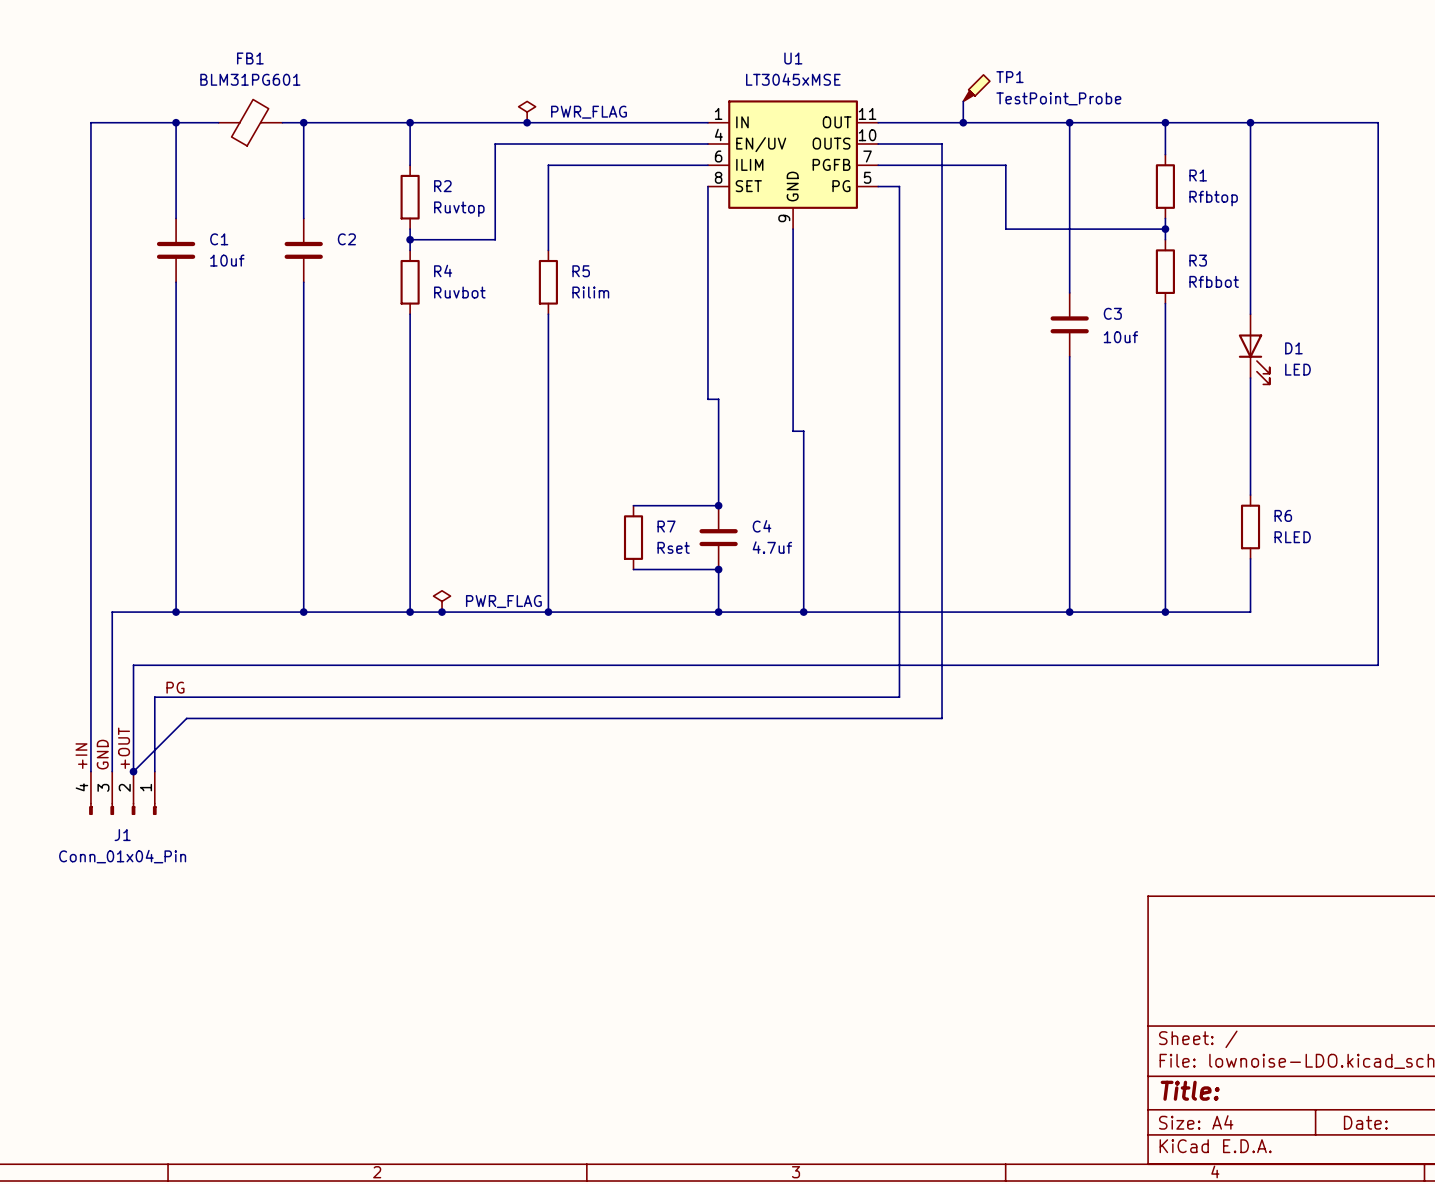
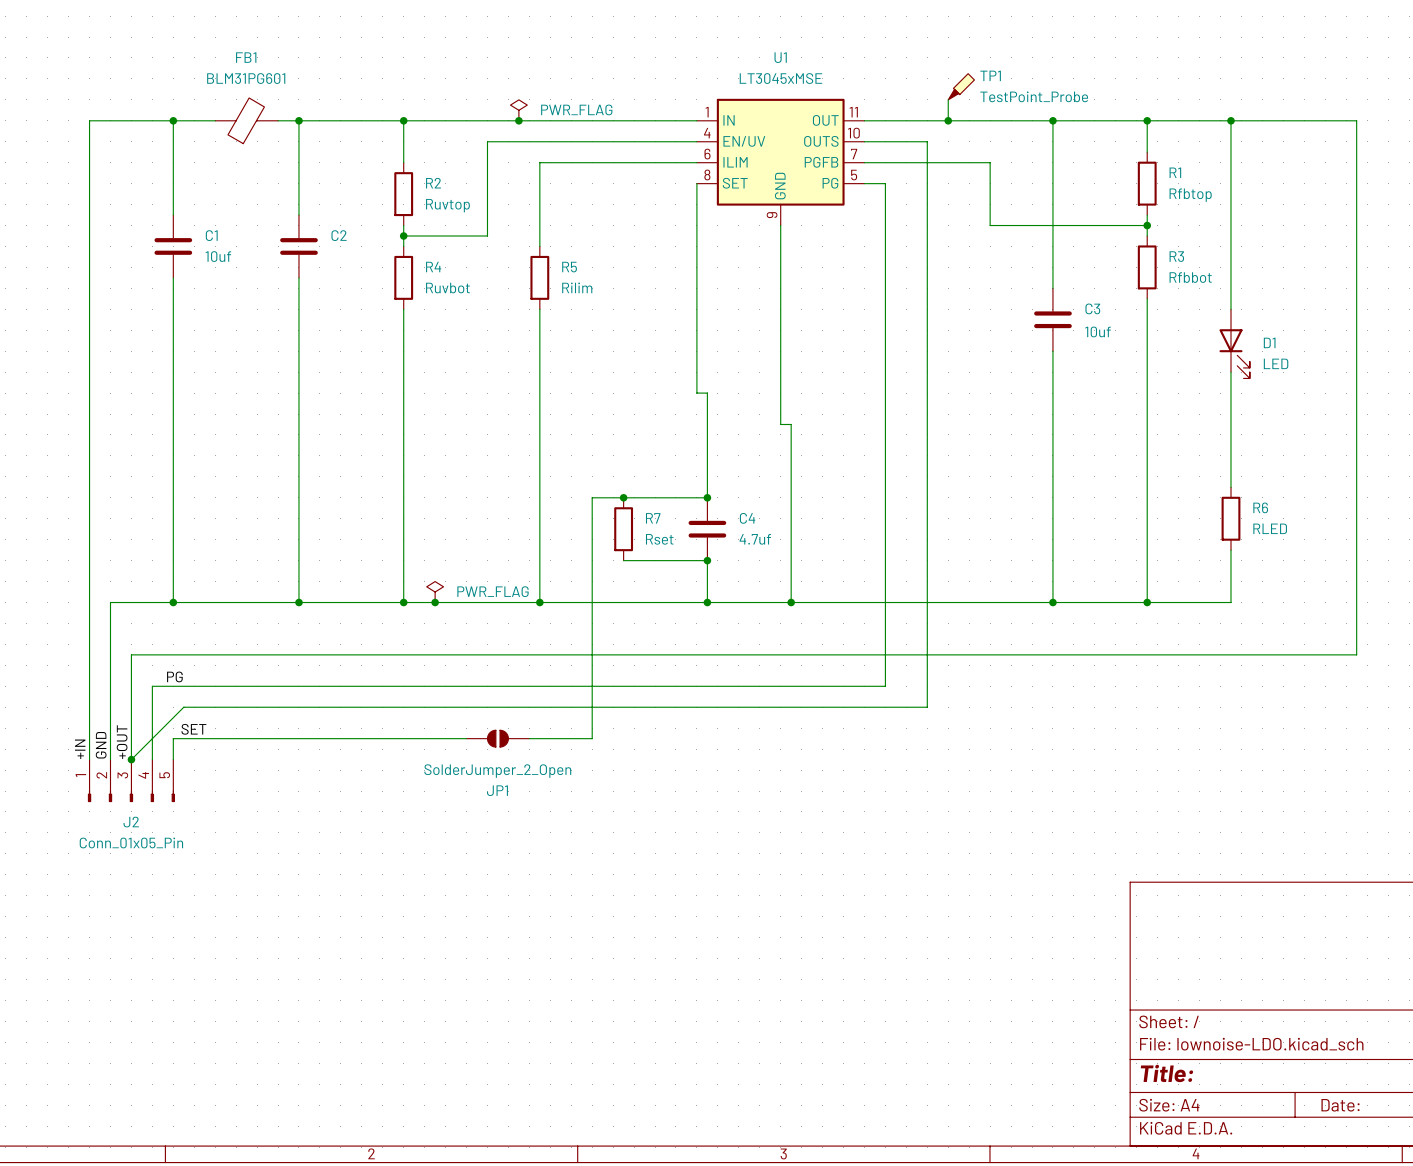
wire: none -> (623, 497) (592, 497) (592, 738) (529, 738)
junction: none -> (623, 497)
label: none -> SET (193, 729)
wire: none -> (466, 738) (173, 738) (173, 759)
JP1: none -> SolderJumper_2_Open (497, 738)
J1: Conn_01x04_Pin (122, 793) -> none
J2: none -> Conn_01x05_Pin (131, 780)

